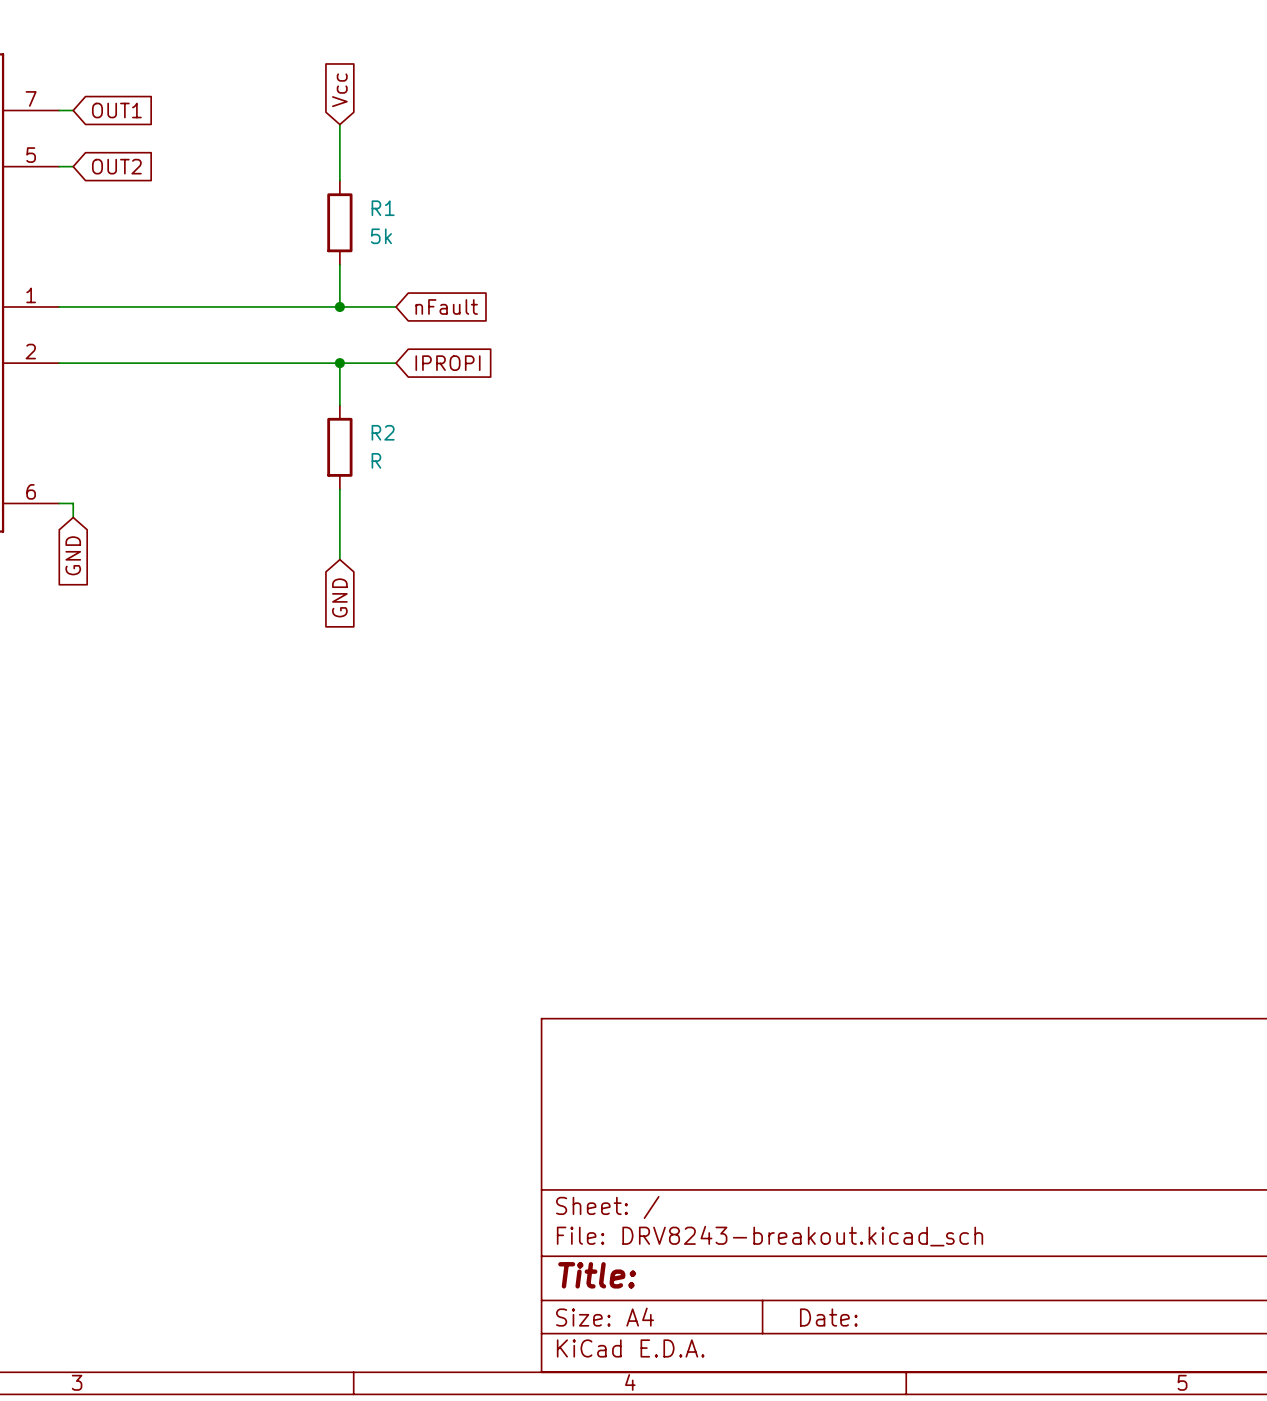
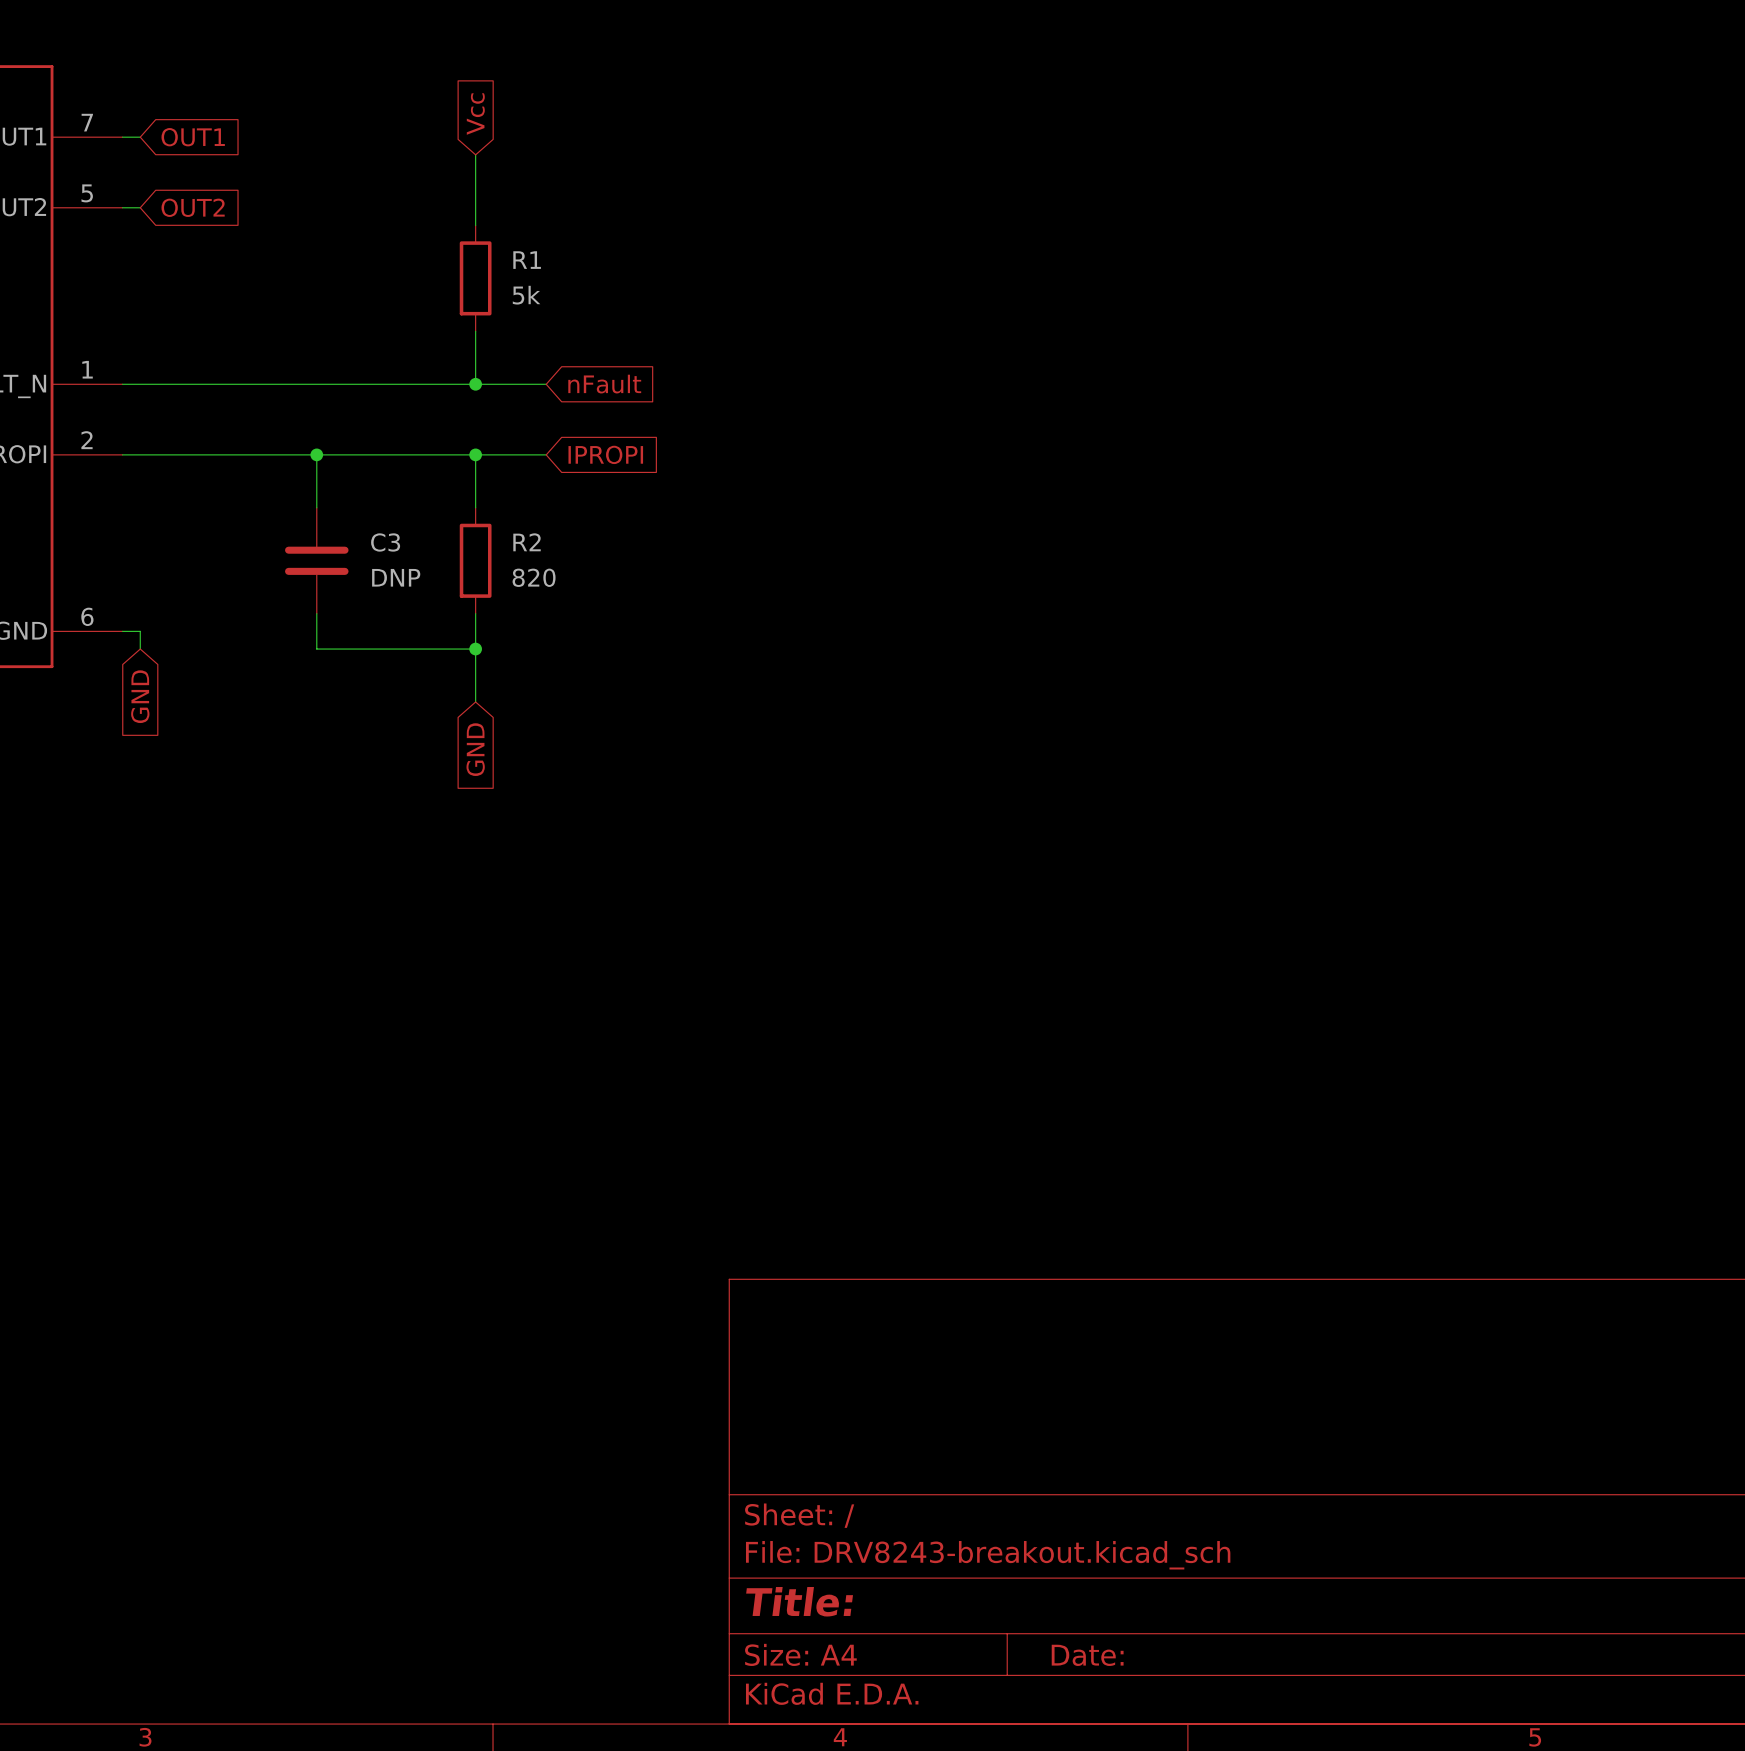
wire: none -> (316, 454) (316, 507)
junction: none -> (316, 454)
C3: none -> DNP (316, 560)
R2 value: R (376, 460) -> 820 (534, 577)
wire: none -> (316, 613) (316, 649) (475, 649)
junction: none -> (475, 649)

